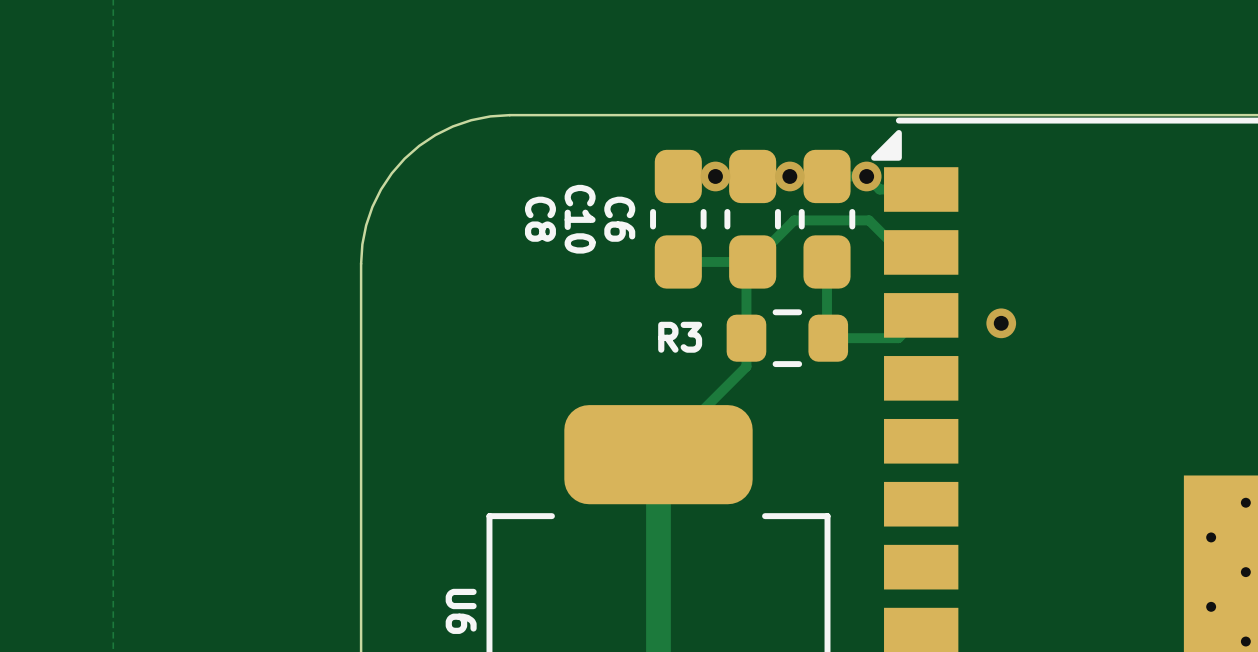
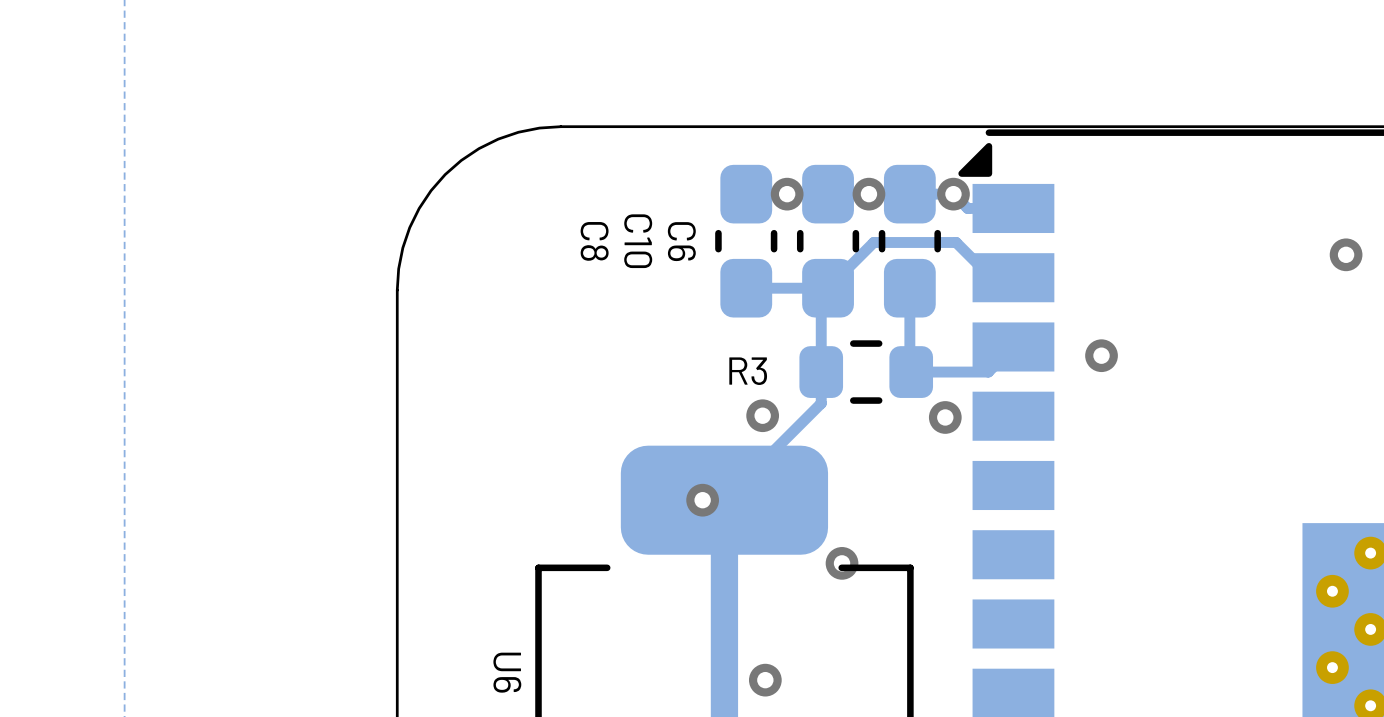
via: none -> (1346, 254)
via: none -> (762, 415)
via: none -> (945, 417)
via: none -> (702, 500)
via: none -> (842, 563)
via: none -> (765, 680)

